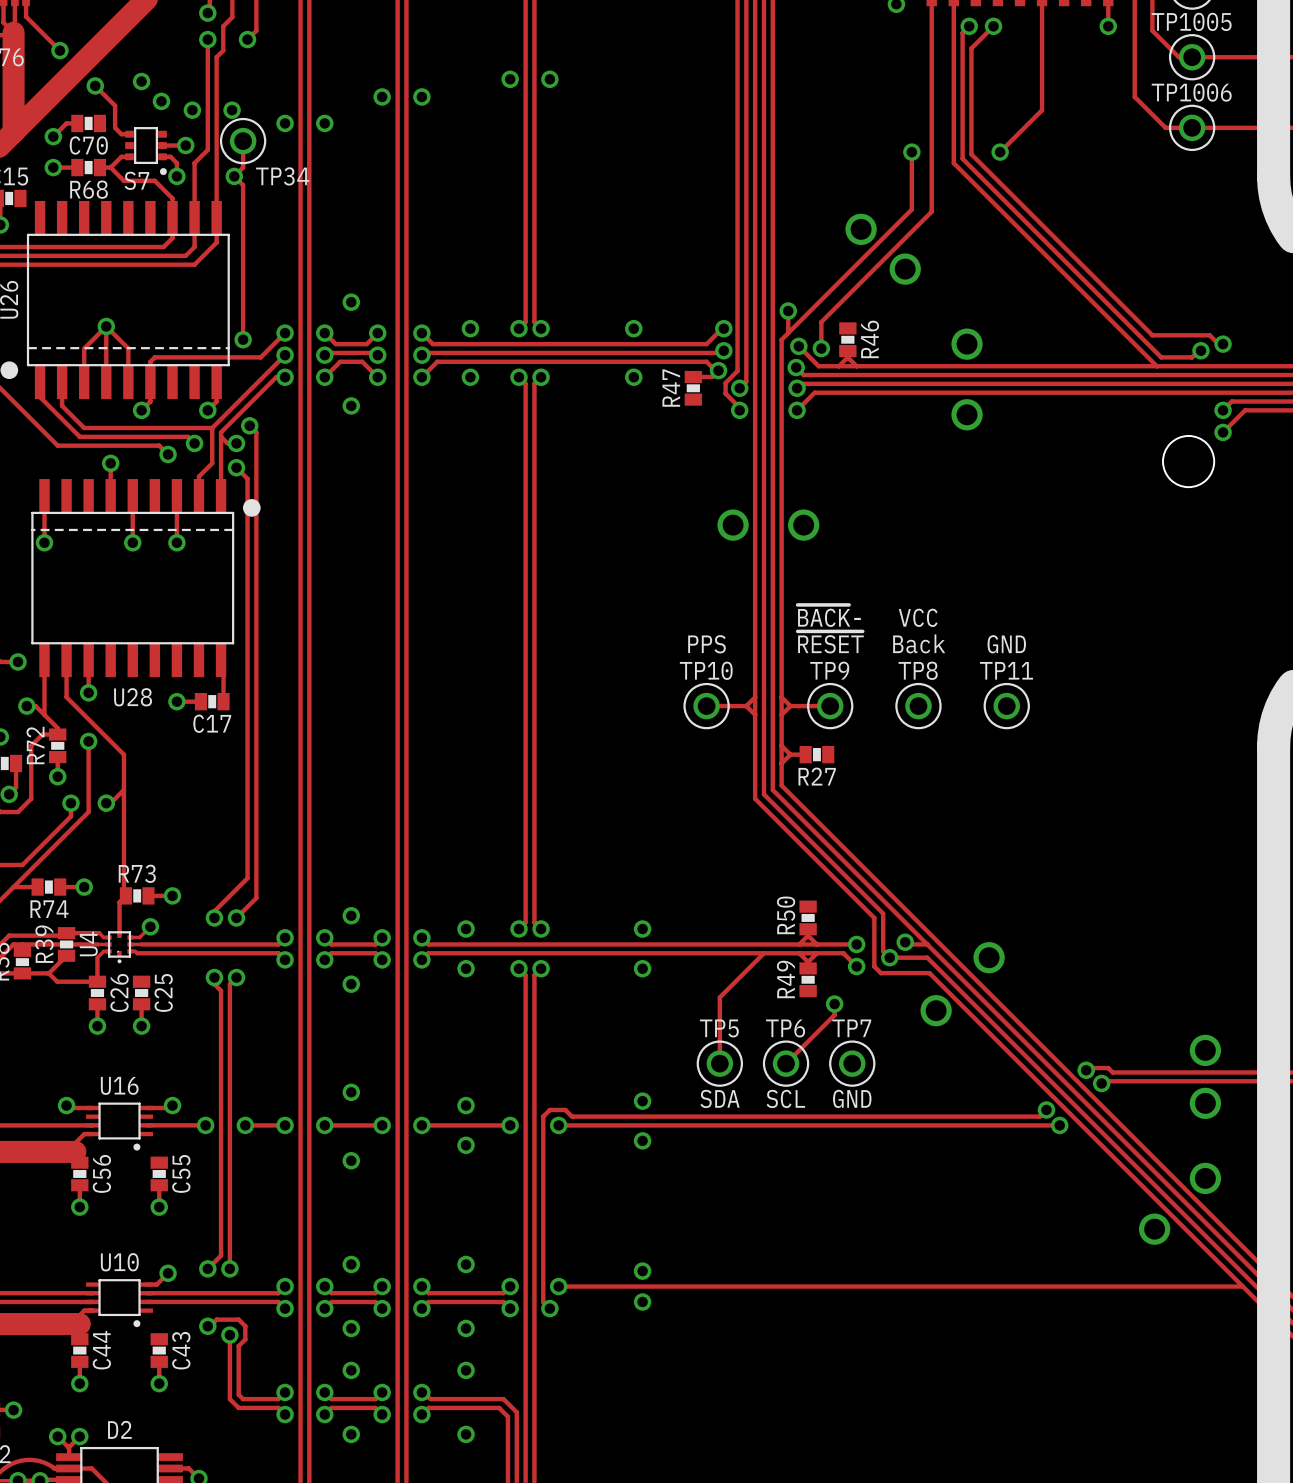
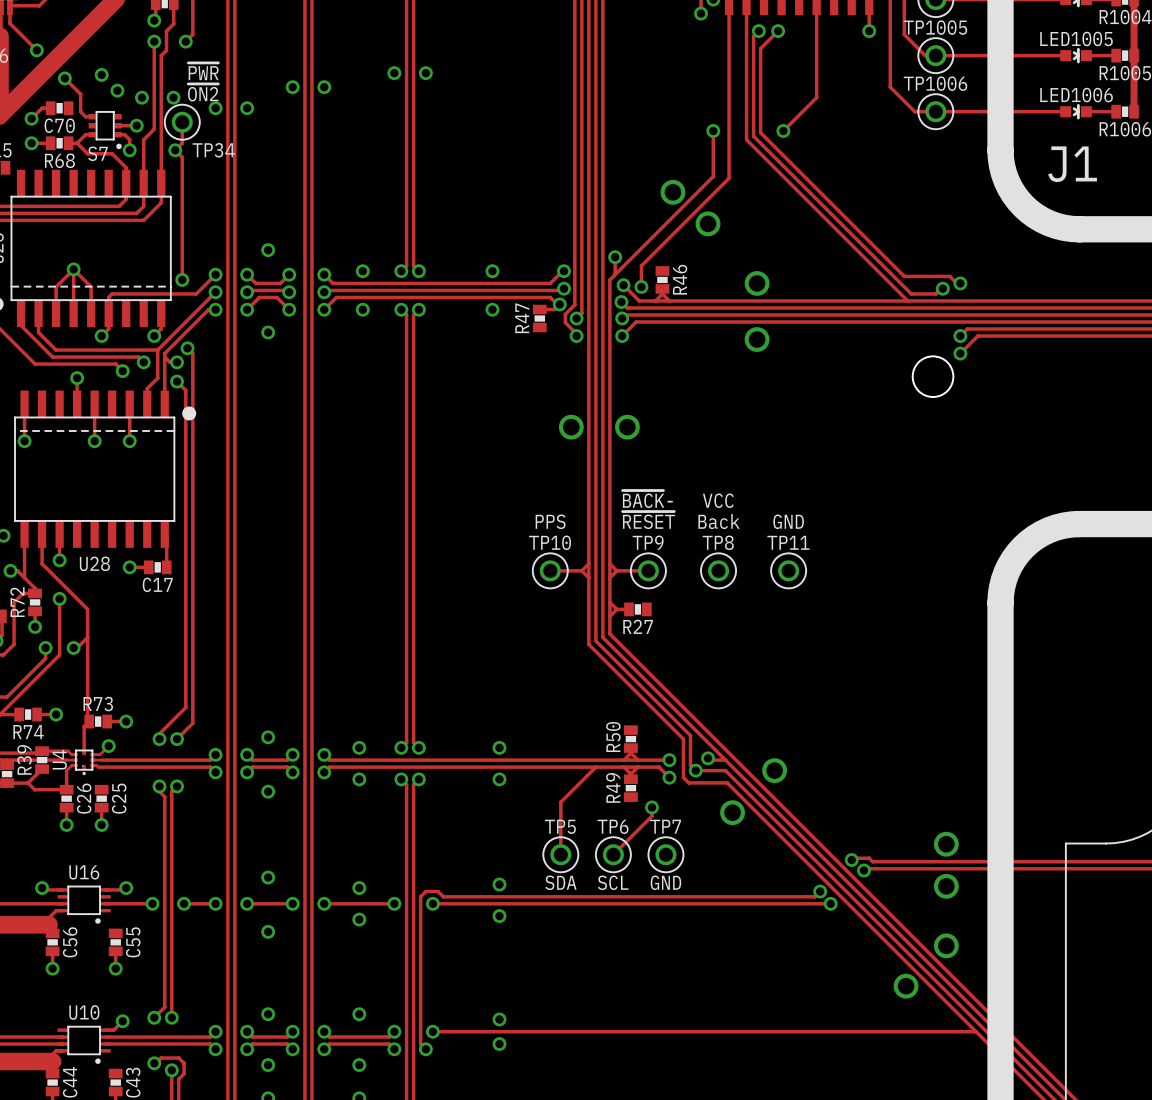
text: none -> ~{PWR} (203, 71)
text: none -> ~{ON2} (203, 92)

